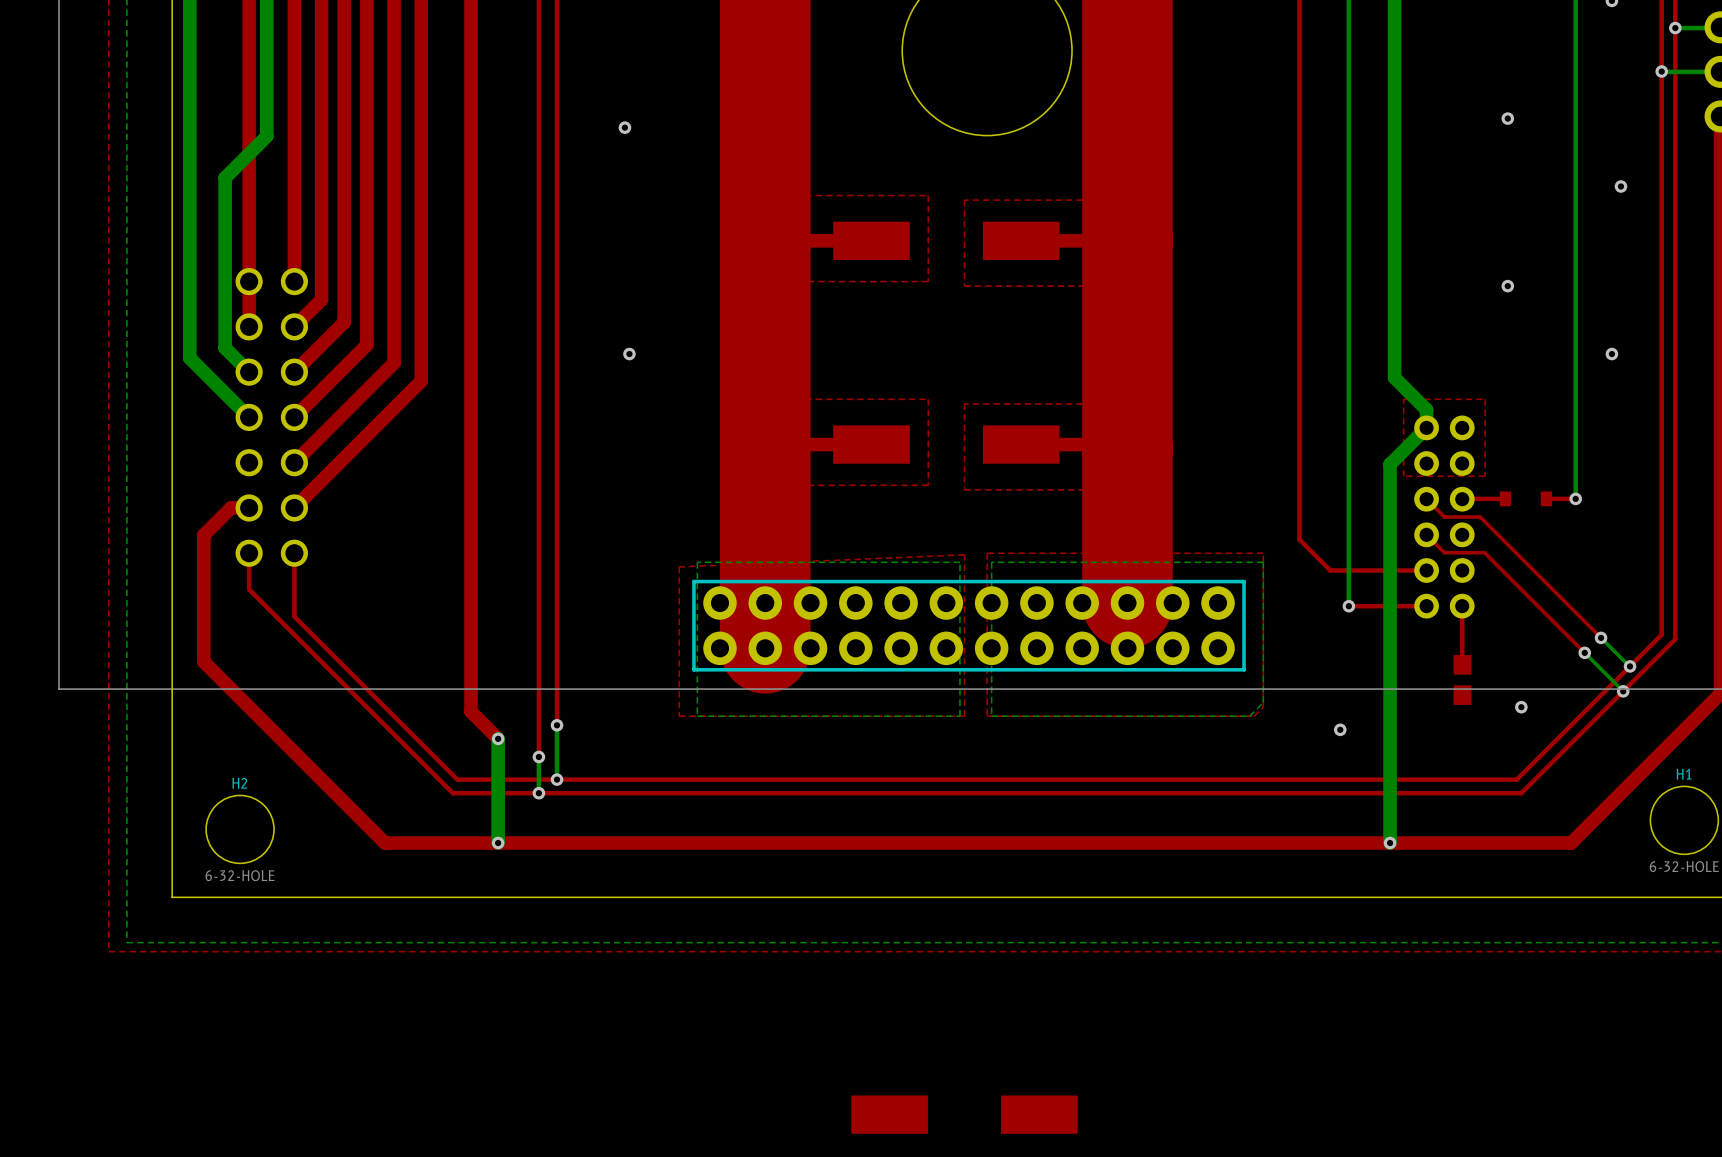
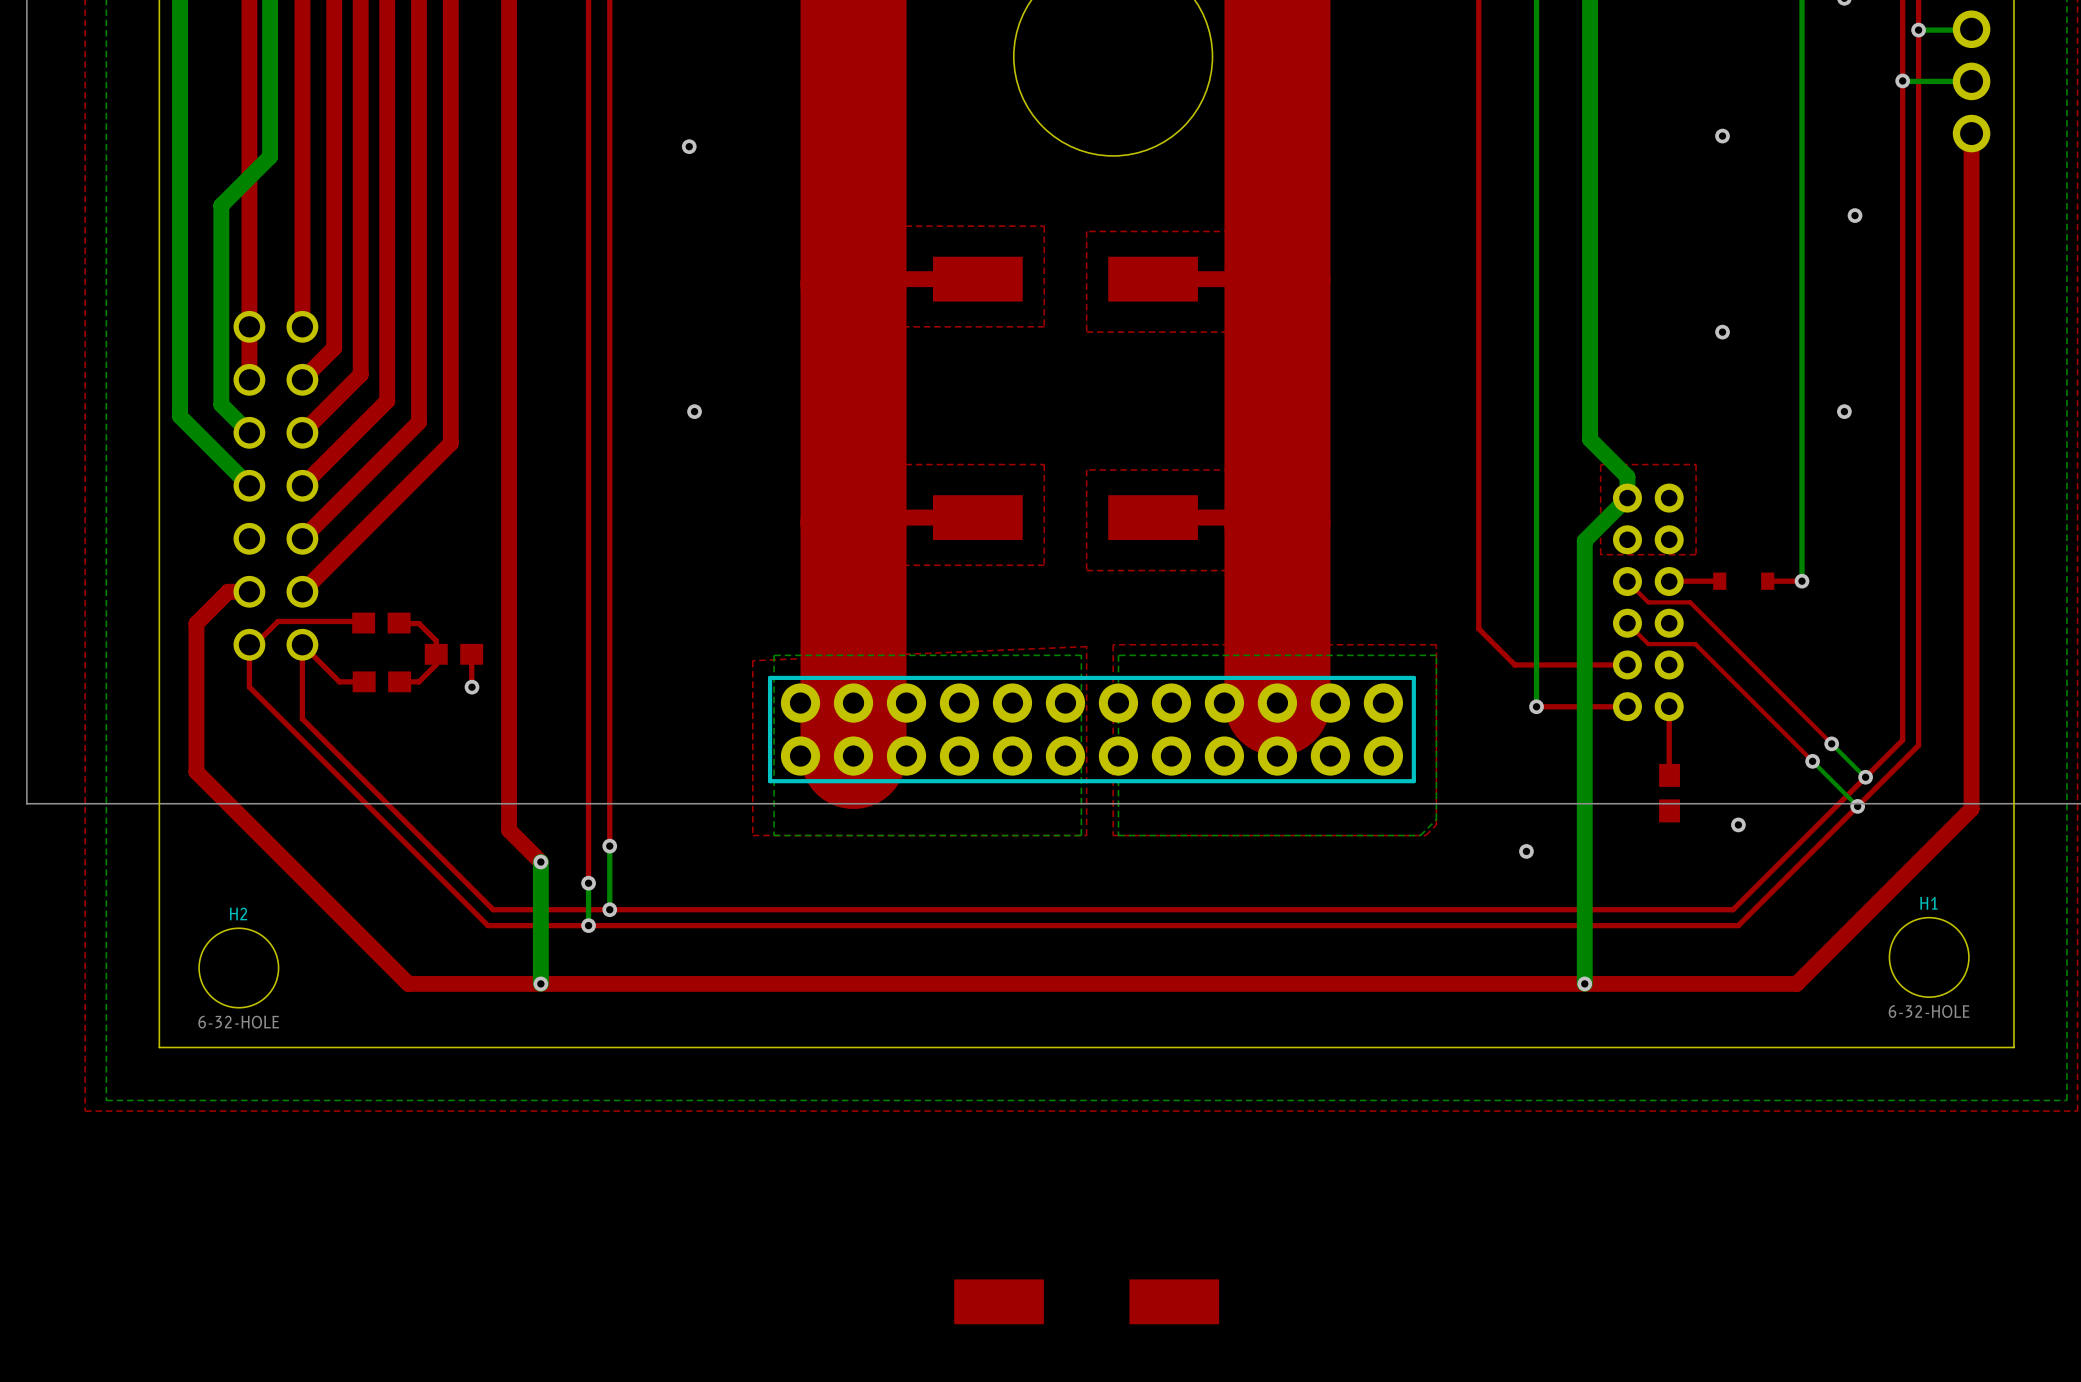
top track: none -> (363, 623) (362, 621) (278, 621) (254, 644) (249, 644)
part: none -> (381, 623)
top track: none -> (399, 623) (419, 623) (436, 640) (436, 664) (419, 681) (399, 681)
top track: none -> (302, 644) (339, 681) (364, 681)
part: none -> (453, 654)
top track: none -> (471, 654) (471, 686)
part: none -> (381, 681)
via: none -> (471, 687)

